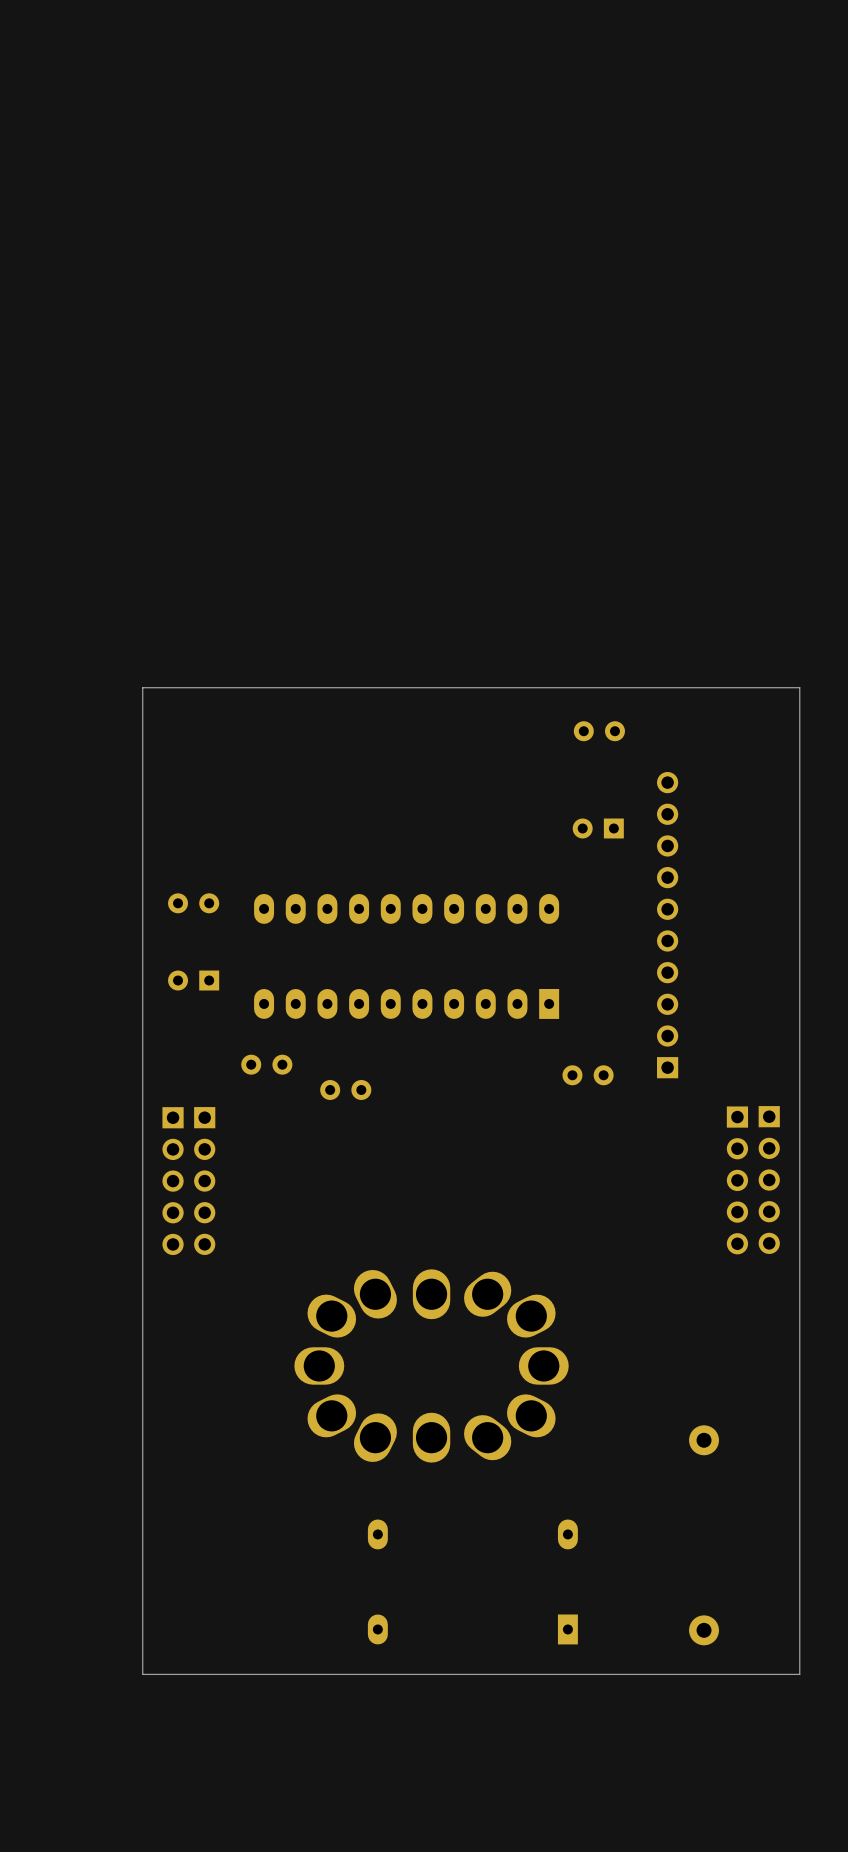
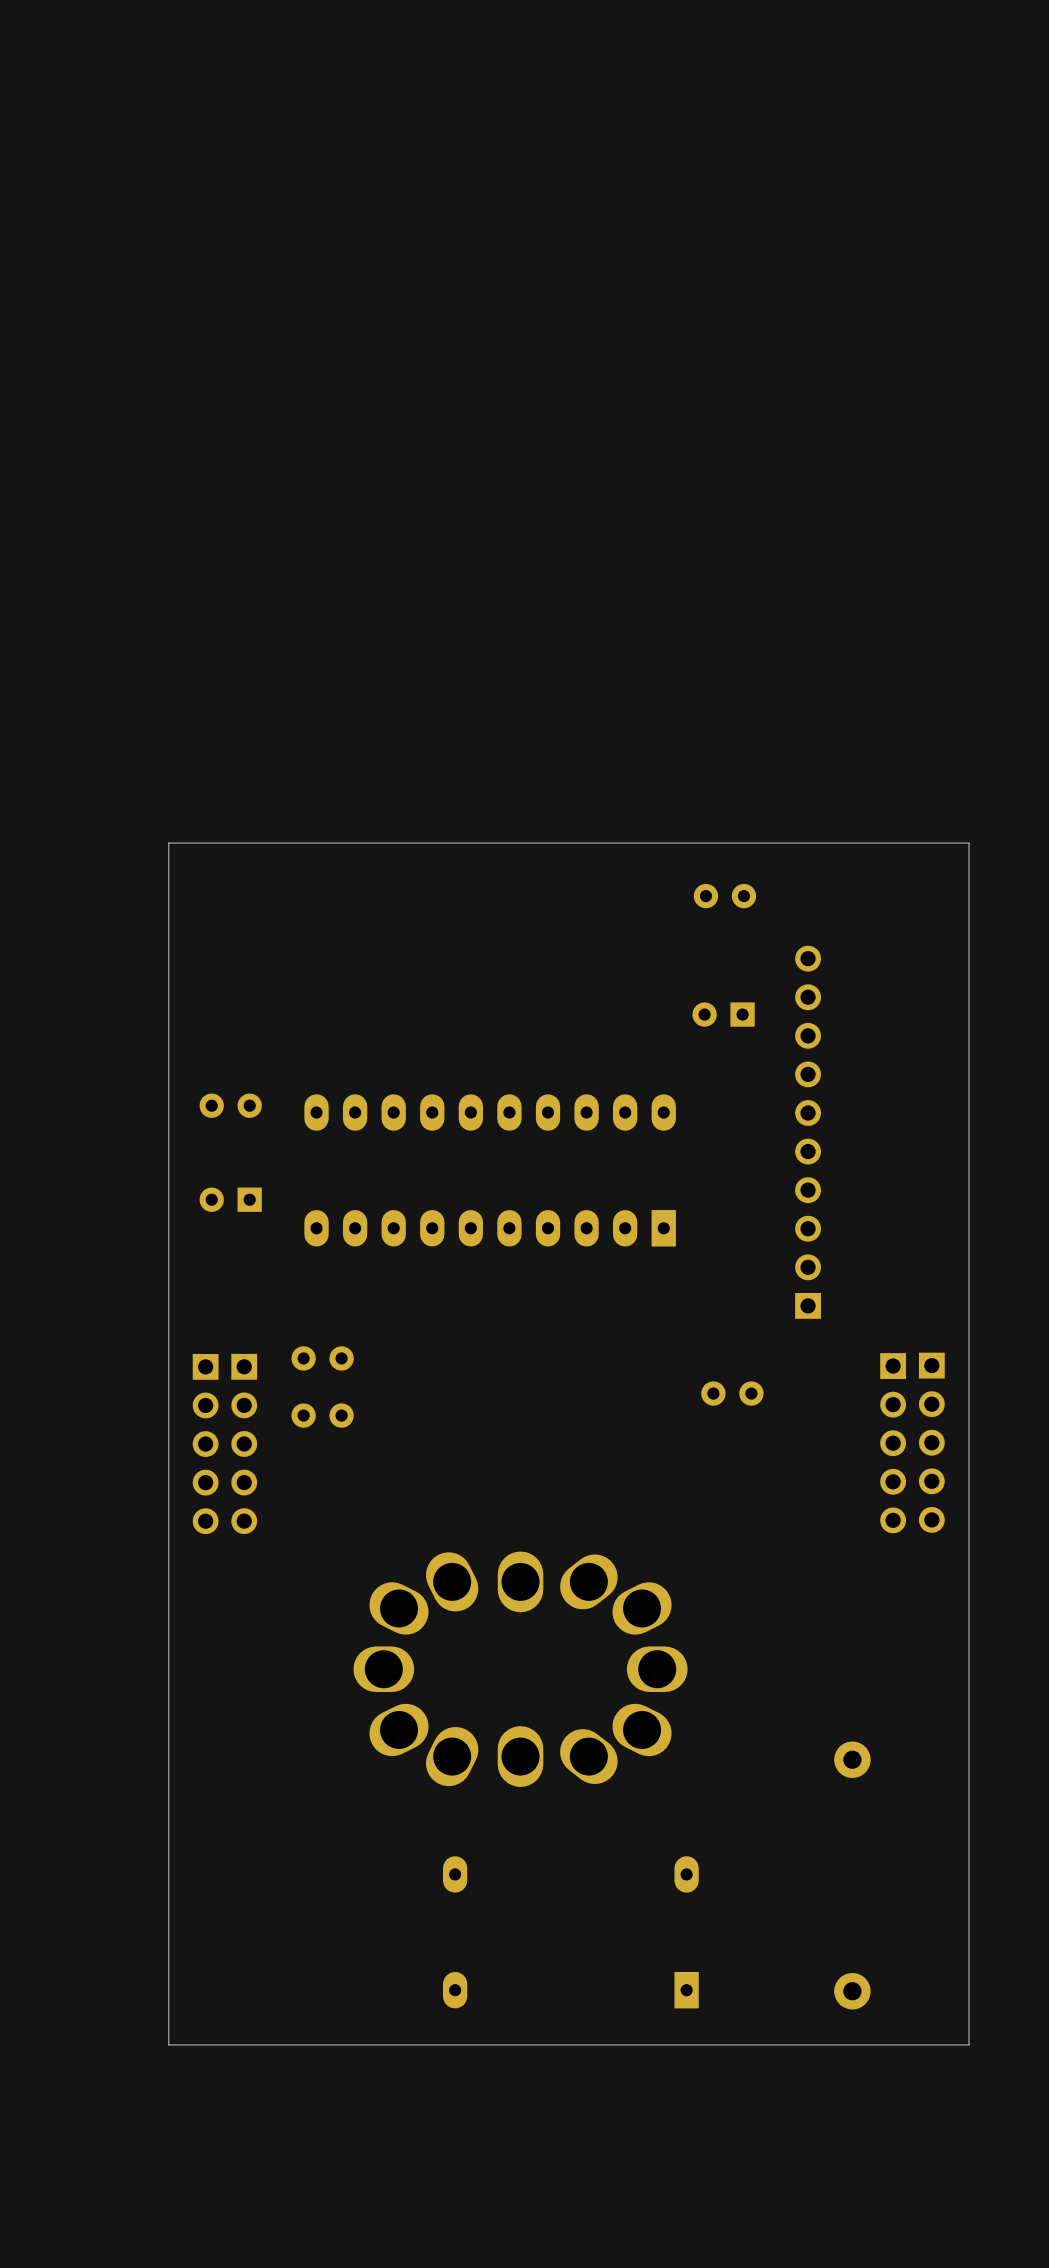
part: (266, 1064) -> none
part position: (588, 1075) -> (732, 1393)
part: (345, 1089) -> none
part: none -> (322, 1358)
part: none -> (322, 1415)

